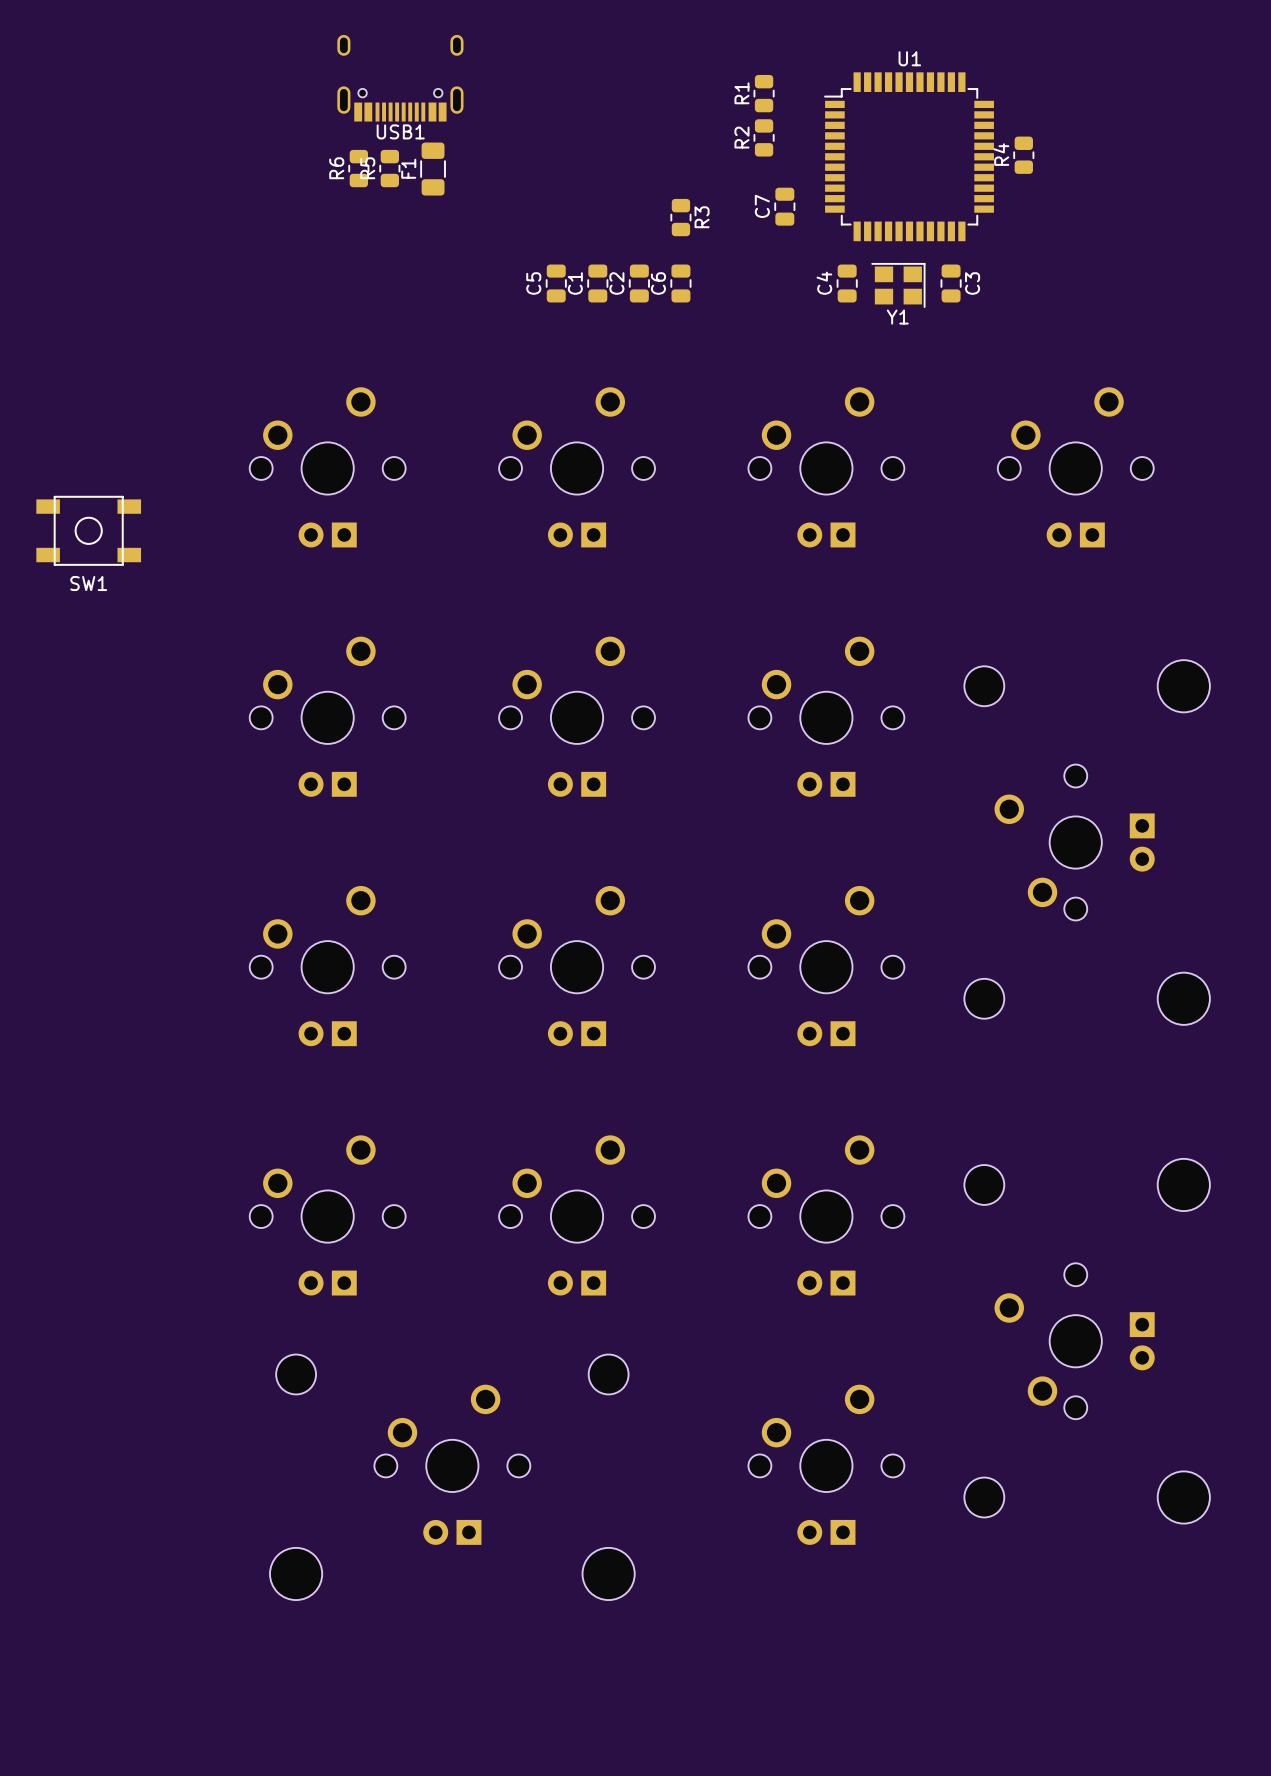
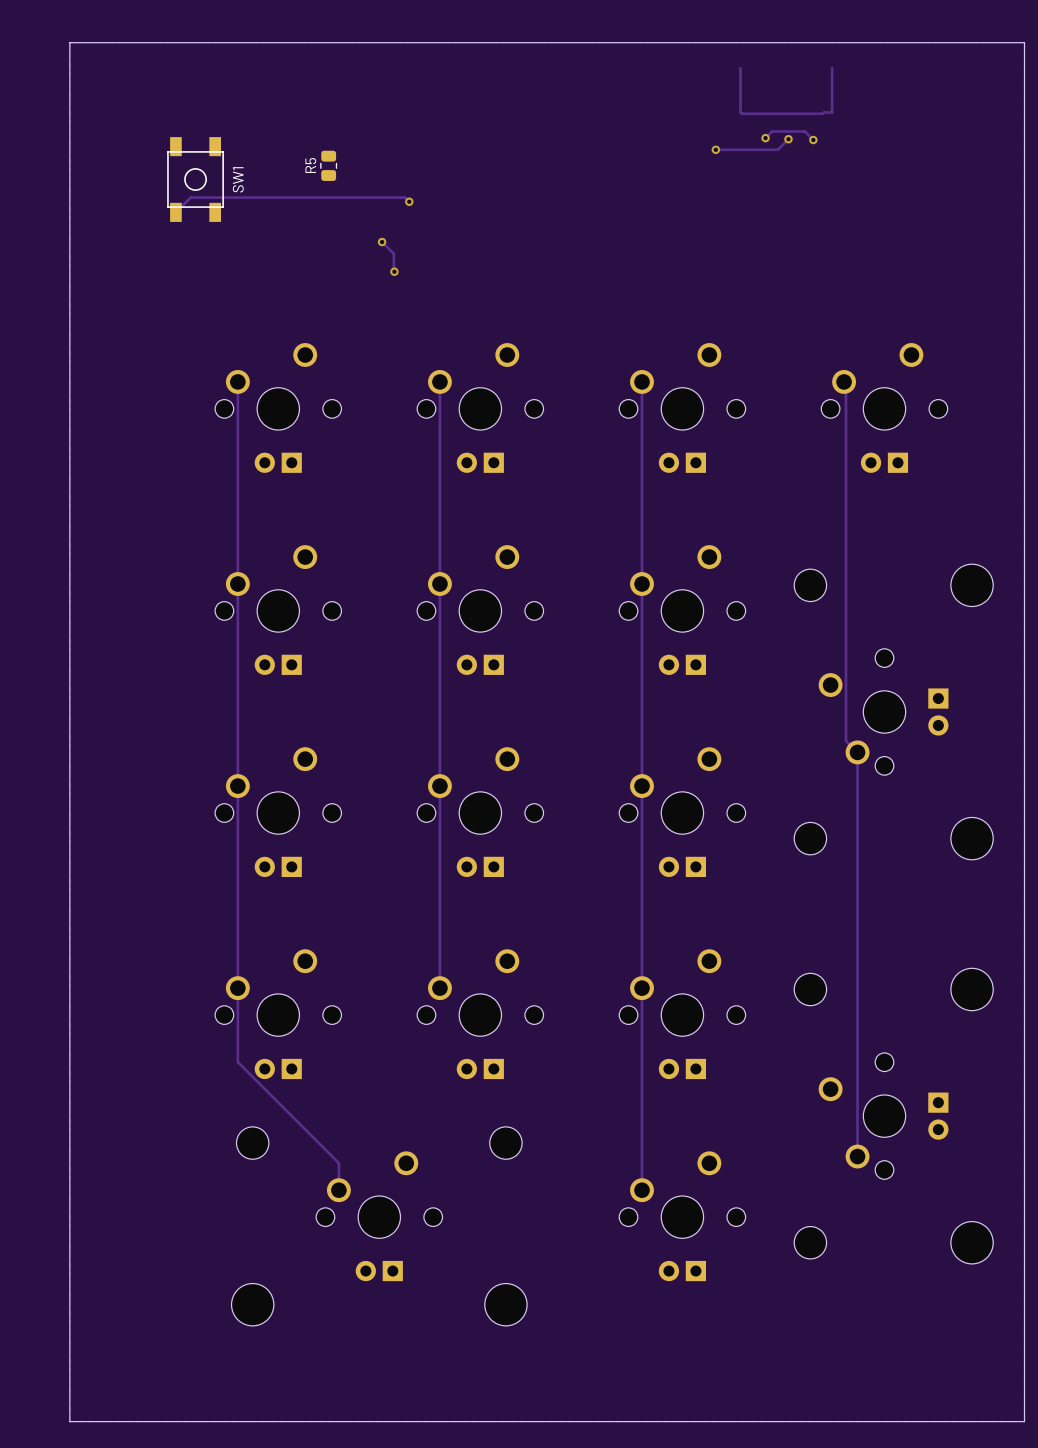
board edge: none -> (69, 42) (1024, 42) (1024, 1421) (69, 1421) (69, 42)
track: none -> (740, 68) (741, 113) (832, 112) (832, 68)
USB1: (400, 78) -> none
R1: (764, 93) -> none
track: none -> (765, 138) (772, 131) (804, 131) (813, 140)
via: none -> (765, 138)
track: none -> (788, 139) (777, 149) (715, 149)
via: none -> (788, 139)
via: none -> (813, 140)
R2: (764, 137) -> none
via: none -> (715, 149)
R4: (1023, 155) -> none
U1: (909, 156) -> none
R6: (358, 168) -> none
F1: (433, 169) -> none
C7: (784, 206) -> none
track: none -> (409, 201) (405, 197) (190, 197) (175, 212)
via: none -> (409, 201)
R3: (680, 217) -> none
track: none -> (382, 242) (393, 253) (394, 271)
via: none -> (382, 242)
C5: (556, 283) -> none
C1: (597, 283) -> none
C2: (639, 283) -> none
C6: (680, 283) -> none
C4: (847, 283) -> none
C3: (951, 283) -> none
Y1: (898, 285) -> none
via: none -> (394, 271)
track: none -> (237, 381) (237, 1062) (338, 1163) (338, 1190)
track: none -> (439, 381) (439, 988)
track: none -> (642, 381) (642, 1190)
track: none -> (844, 381) (845, 383) (845, 740) (857, 752) (857, 1156)
SW1 rotation: 0° (88, 530) -> 90° clockwise (195, 179)
SW1 position: (88, 530) -> (195, 179)
SW1 name position: SW1 (88, 583) -> SW1 (238, 179)

